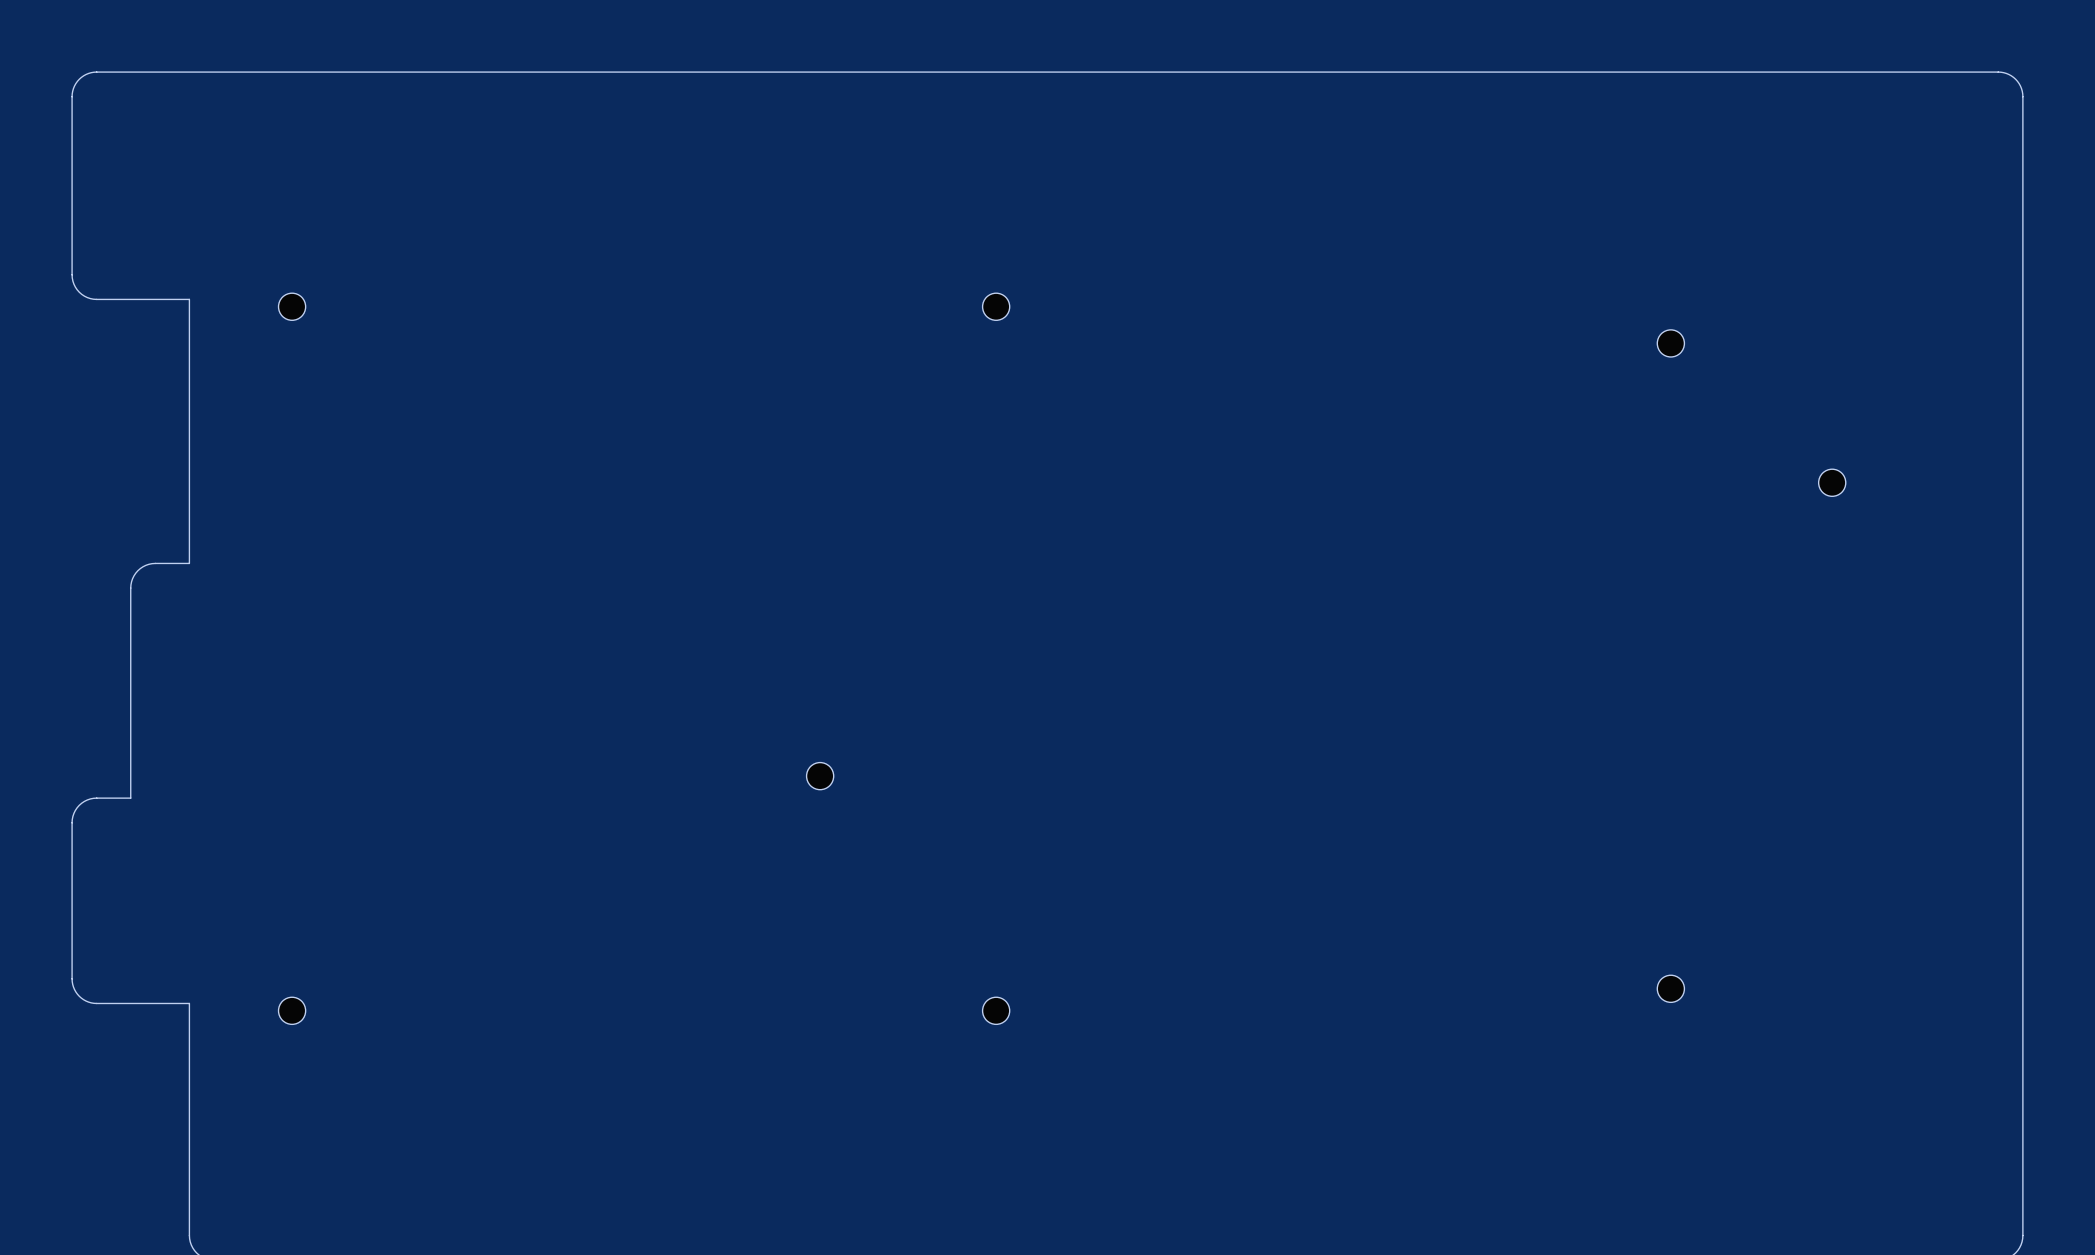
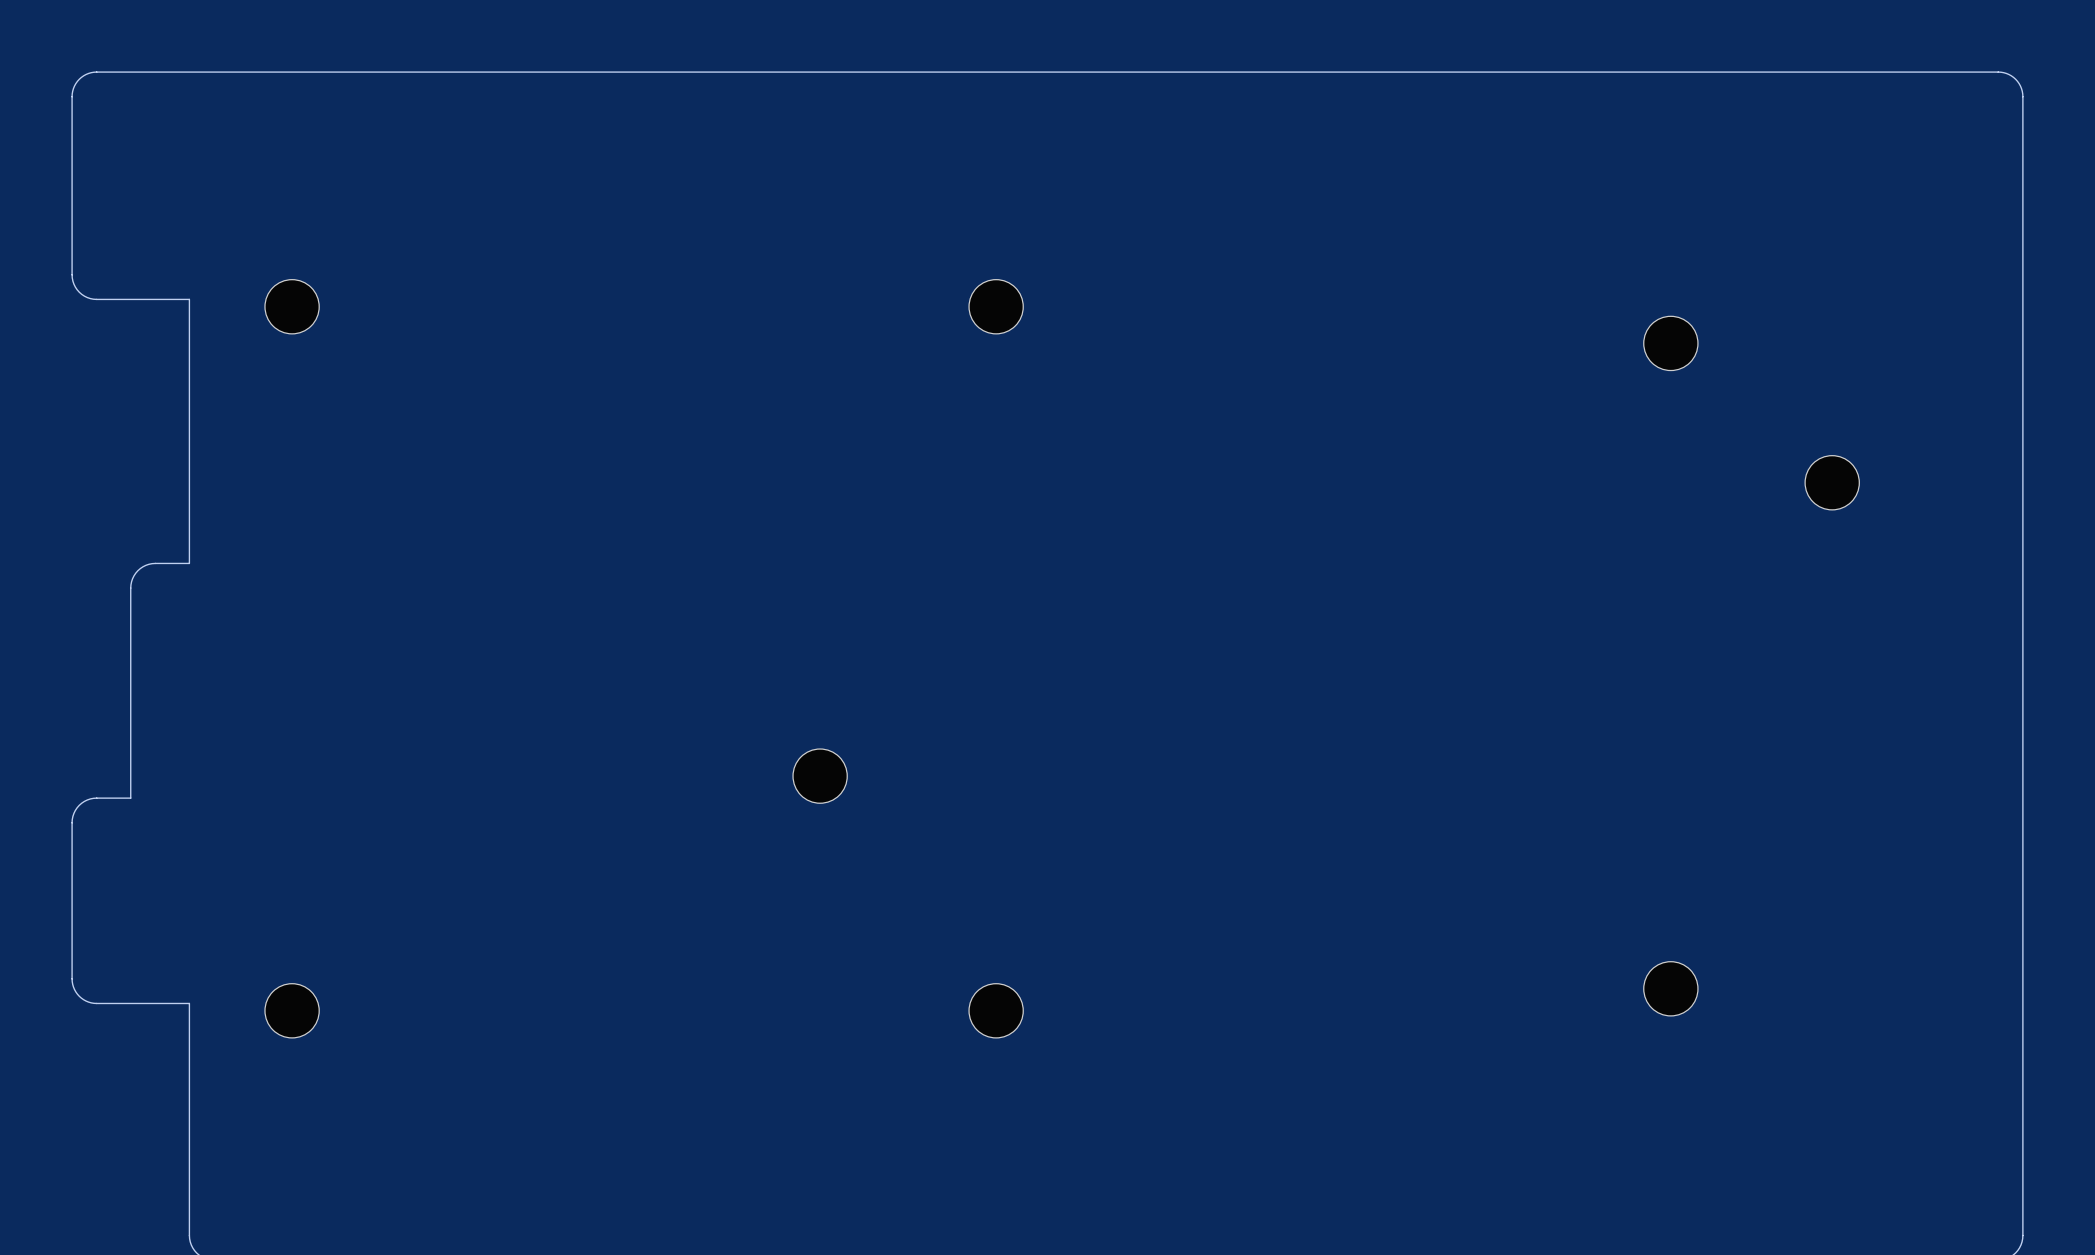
part footprint: [278, 293, 306, 321] -> [264, 279, 320, 335]
part footprint: [982, 293, 1010, 321] -> [968, 279, 1024, 335]
part footprint: [1657, 329, 1685, 357] -> [1643, 315, 1699, 372]
part footprint: [1818, 469, 1846, 497] -> [1804, 455, 1860, 511]
part footprint: [806, 762, 834, 790] -> [792, 748, 848, 804]
part footprint: [1657, 975, 1685, 1003] -> [1643, 961, 1699, 1017]
part footprint: [278, 997, 306, 1025] -> [264, 983, 320, 1039]
part footprint: [982, 997, 1010, 1025] -> [968, 983, 1024, 1039]

